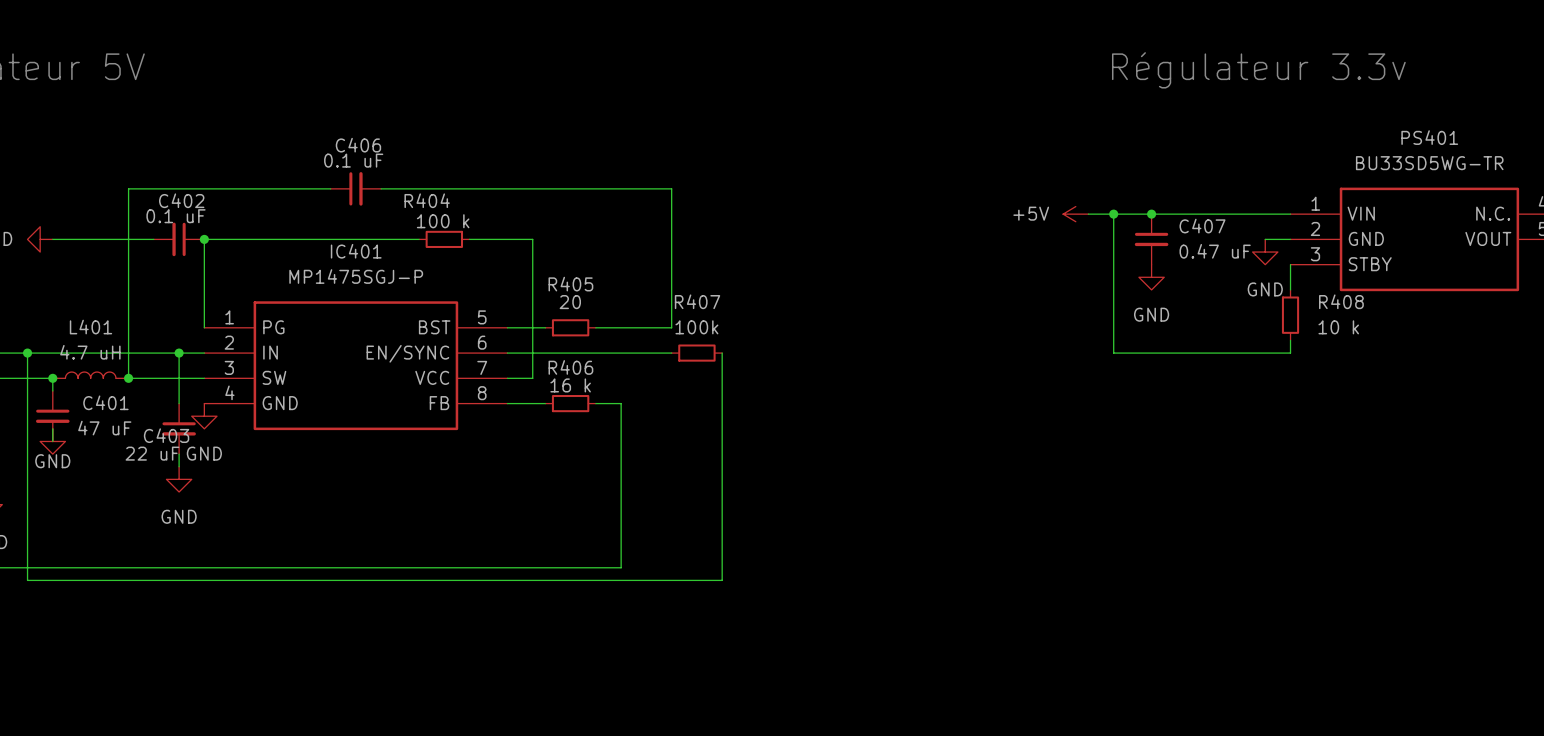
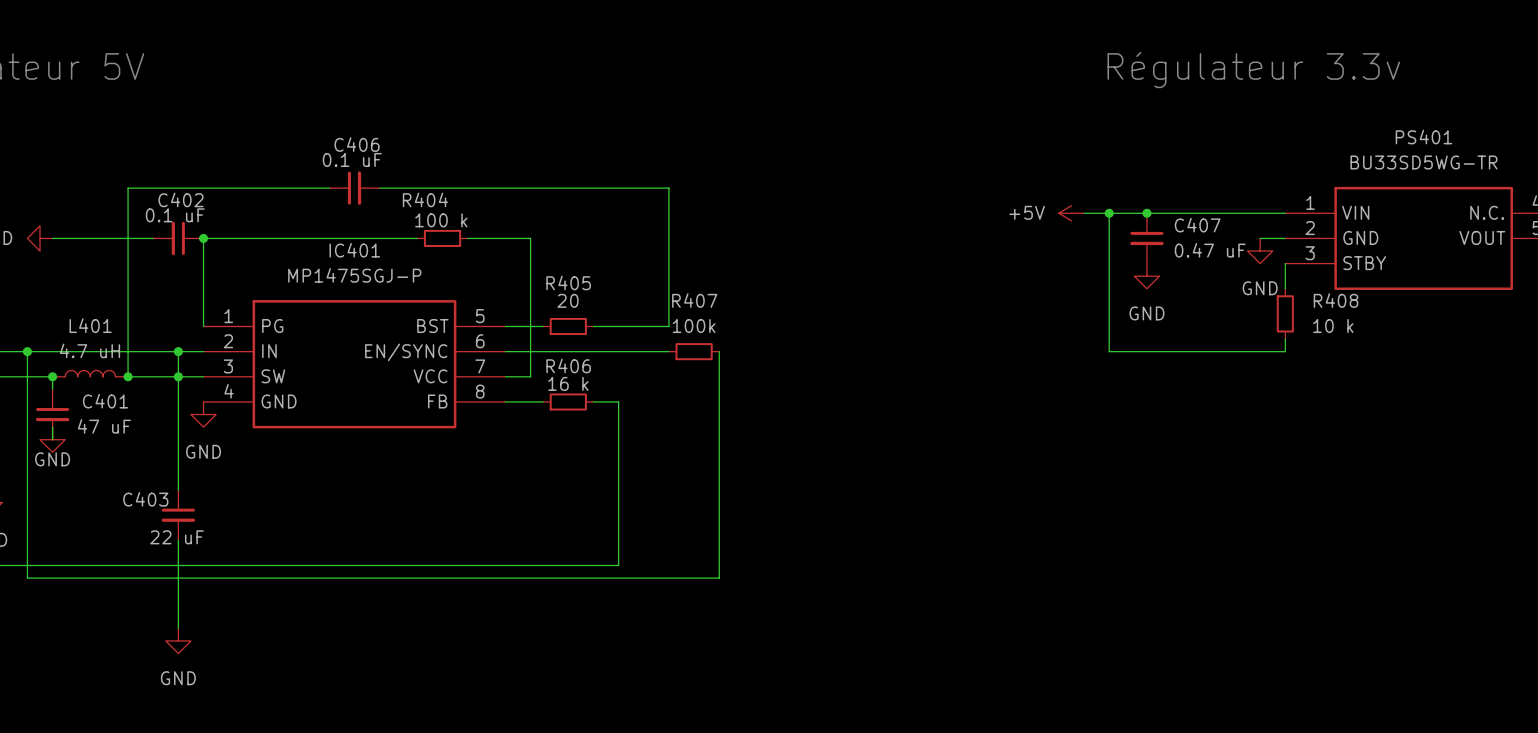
junction: none -> (178, 376)
C403 position: (179, 428) -> (178, 515)
C403 name position: C403 (166, 435) -> C403 (145, 499)
C403 value position: 22 uF (152, 453) -> 22 uF (177, 537)
power symbol position: GND (179, 479) -> GND (178, 640)
wire: none -> (178, 540) (178, 628)

